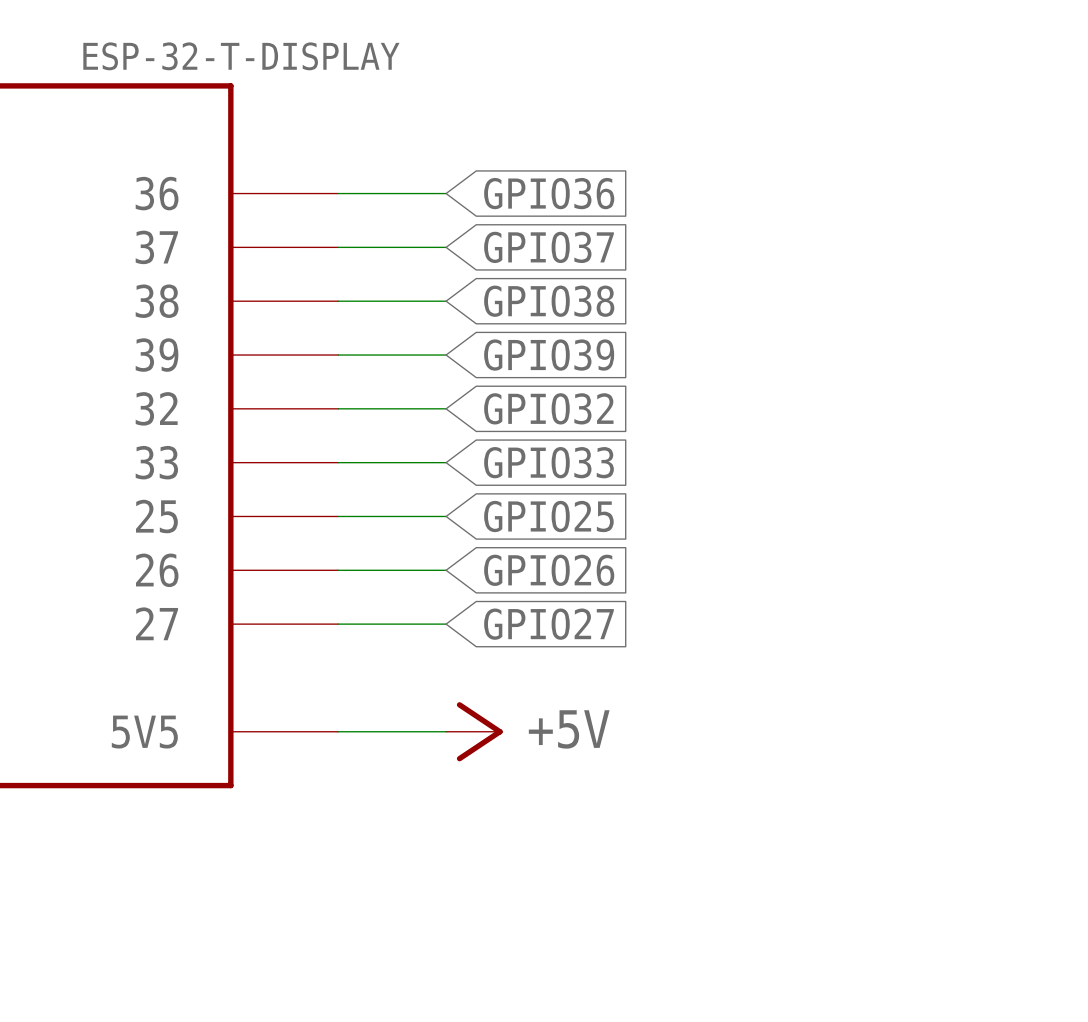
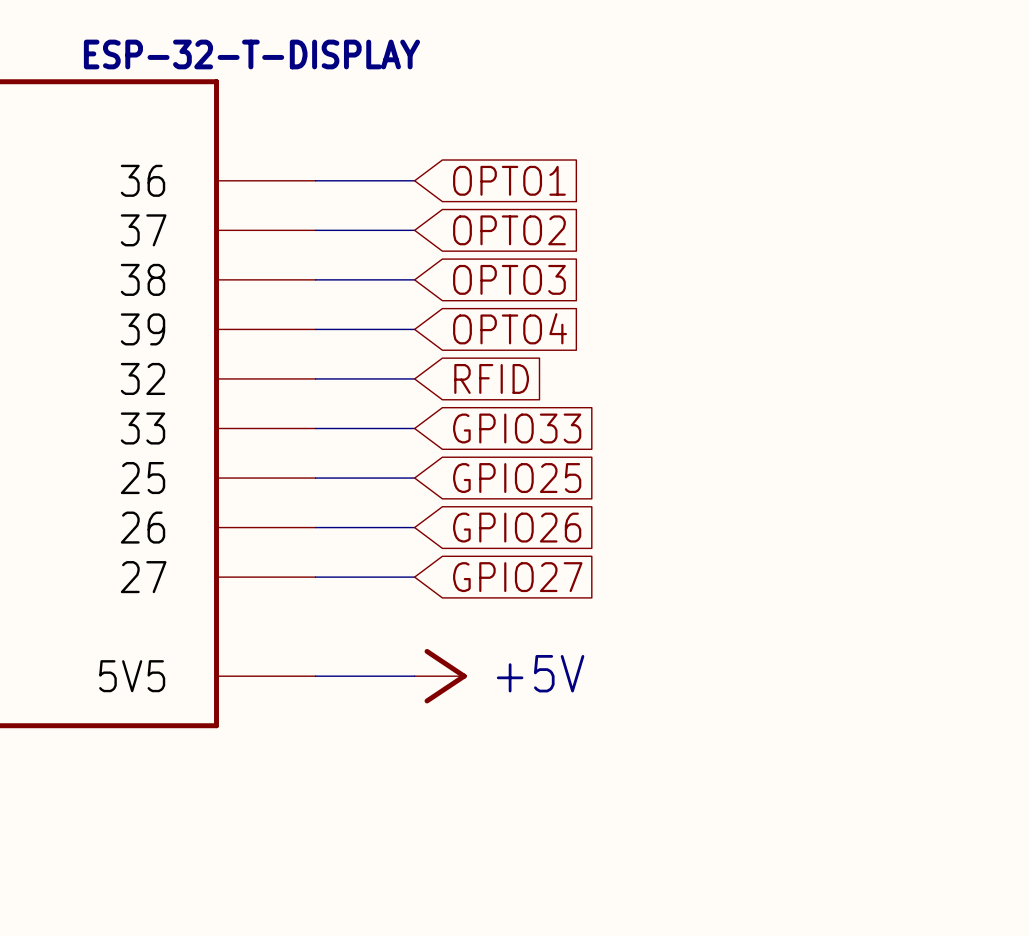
global label: GPIO36 (549, 193) -> OPTO1 (509, 180)
global label: GPIO37 (549, 247) -> OPTO2 (509, 230)
global label: GPIO38 (549, 301) -> OPTO3 (509, 279)
global label: GPIO39 (549, 355) -> OPTO4 (510, 328)
global label: GPIO32 (548, 408) -> RFID (491, 378)

